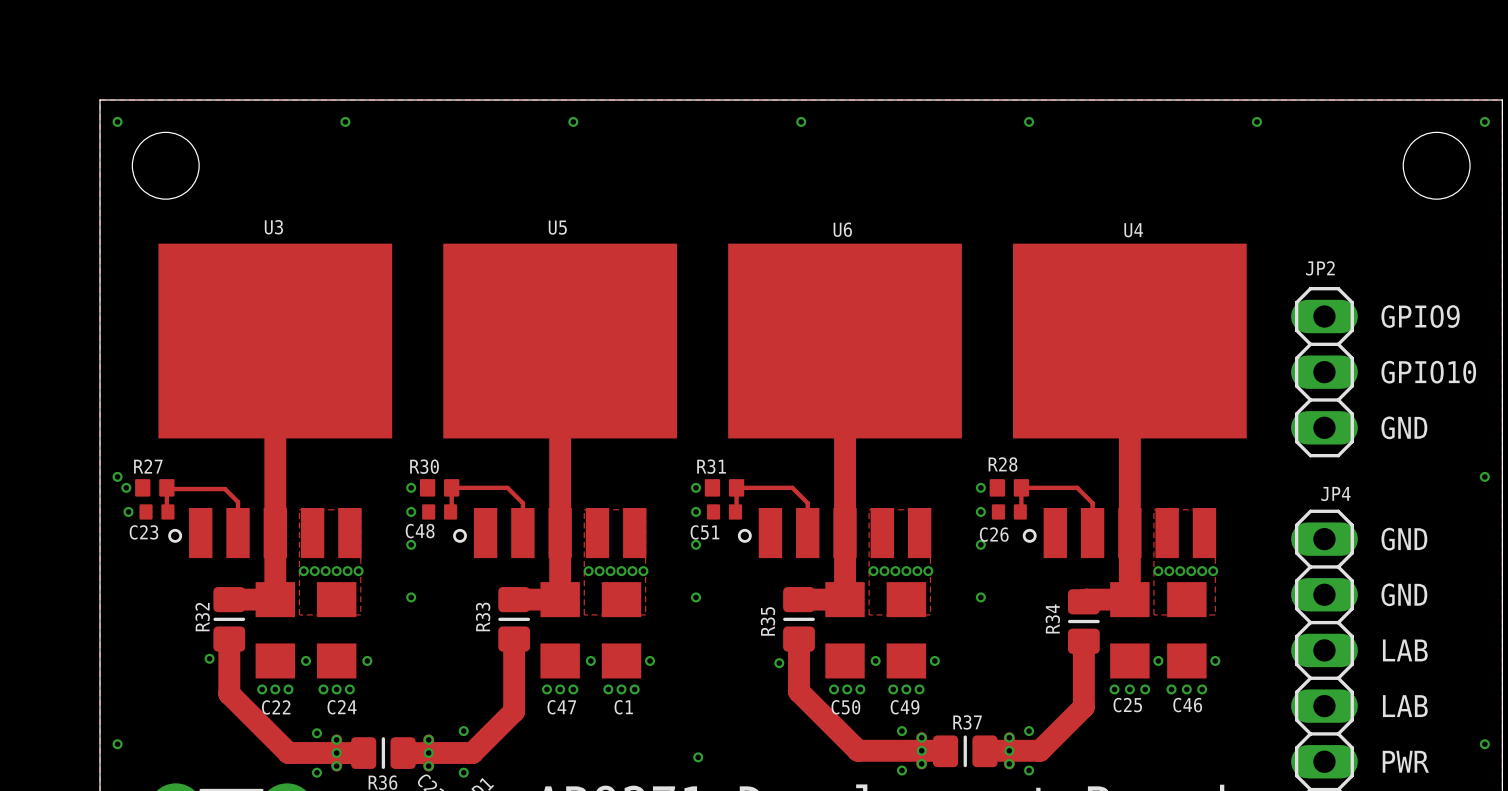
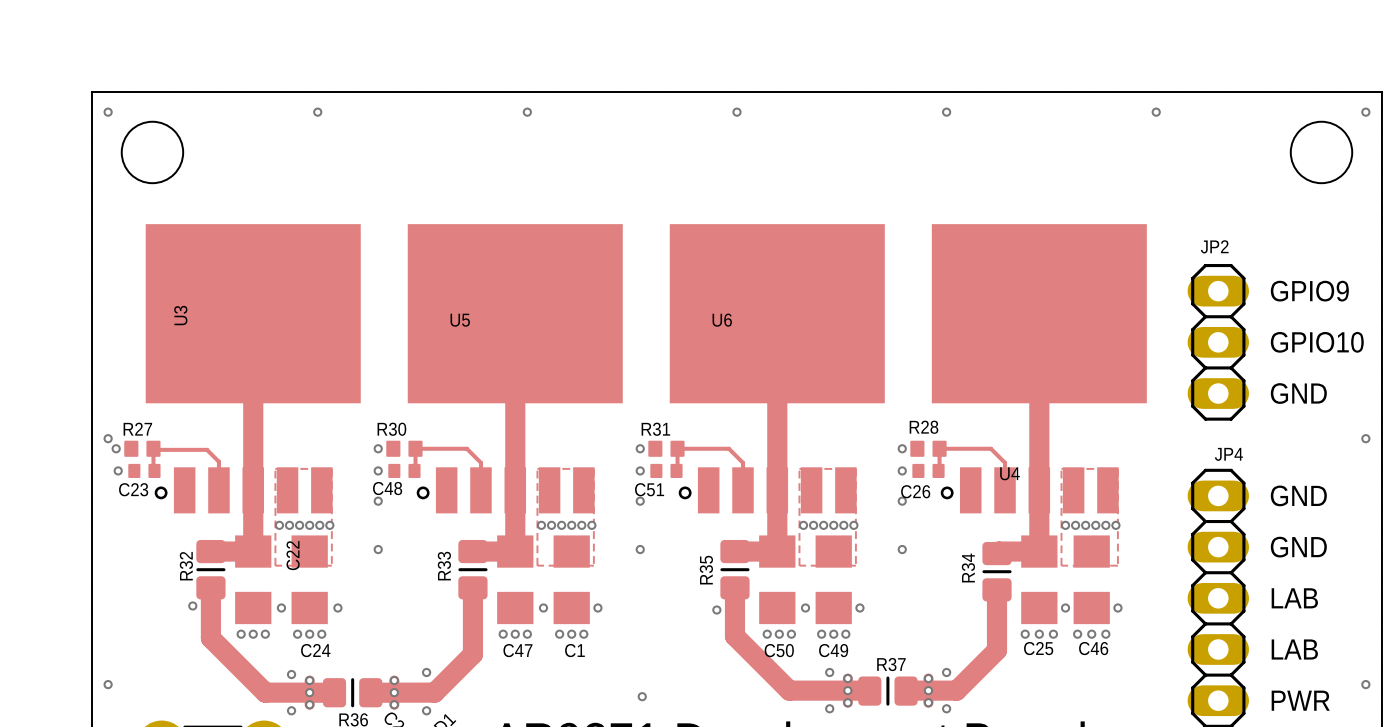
U3 name rotation: 0° (273, 227) -> 90° counterclockwise (180, 315)
U3 name position: U3 (273, 227) -> U3 (180, 315)
U5 name position: U5 (557, 227) -> U5 (460, 320)
U6 name position: U6 (842, 229) -> U6 (722, 320)
U4 name position: U4 (1133, 230) -> U4 (1009, 473)
C22 name rotation: 0° (276, 707) -> 90° counterclockwise (293, 555)
C22 name position: C22 (276, 707) -> C22 (293, 555)

